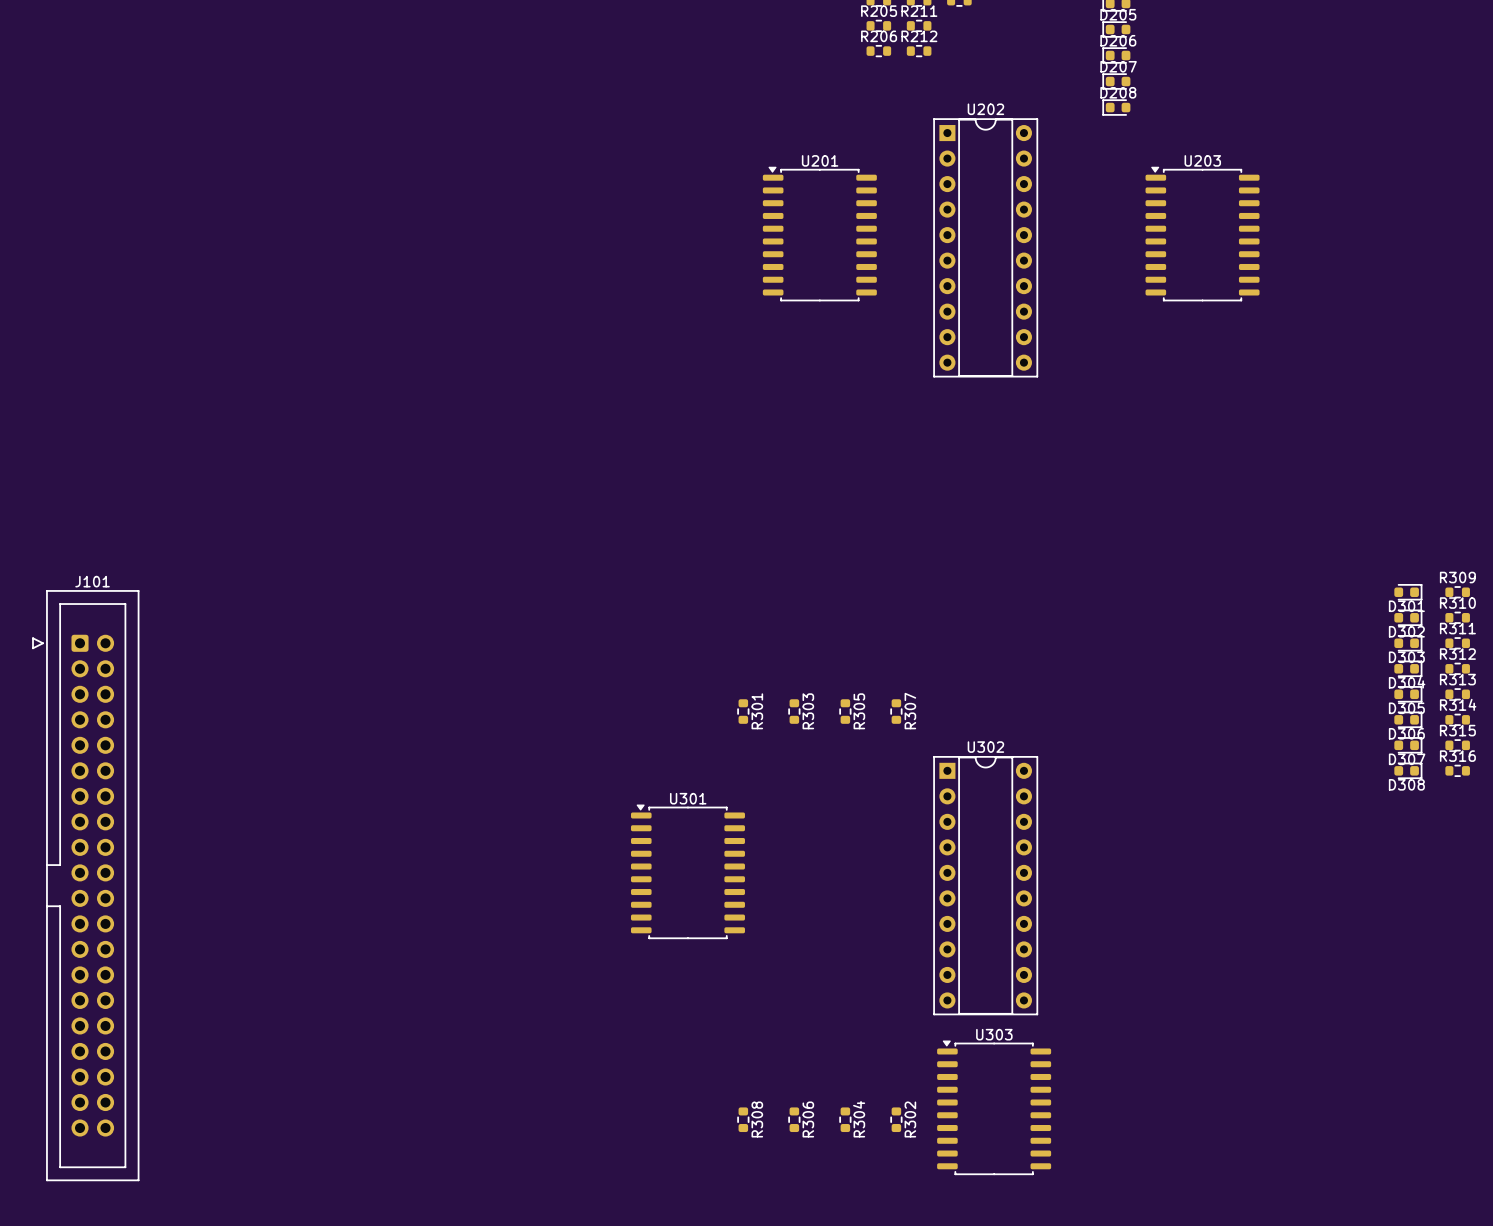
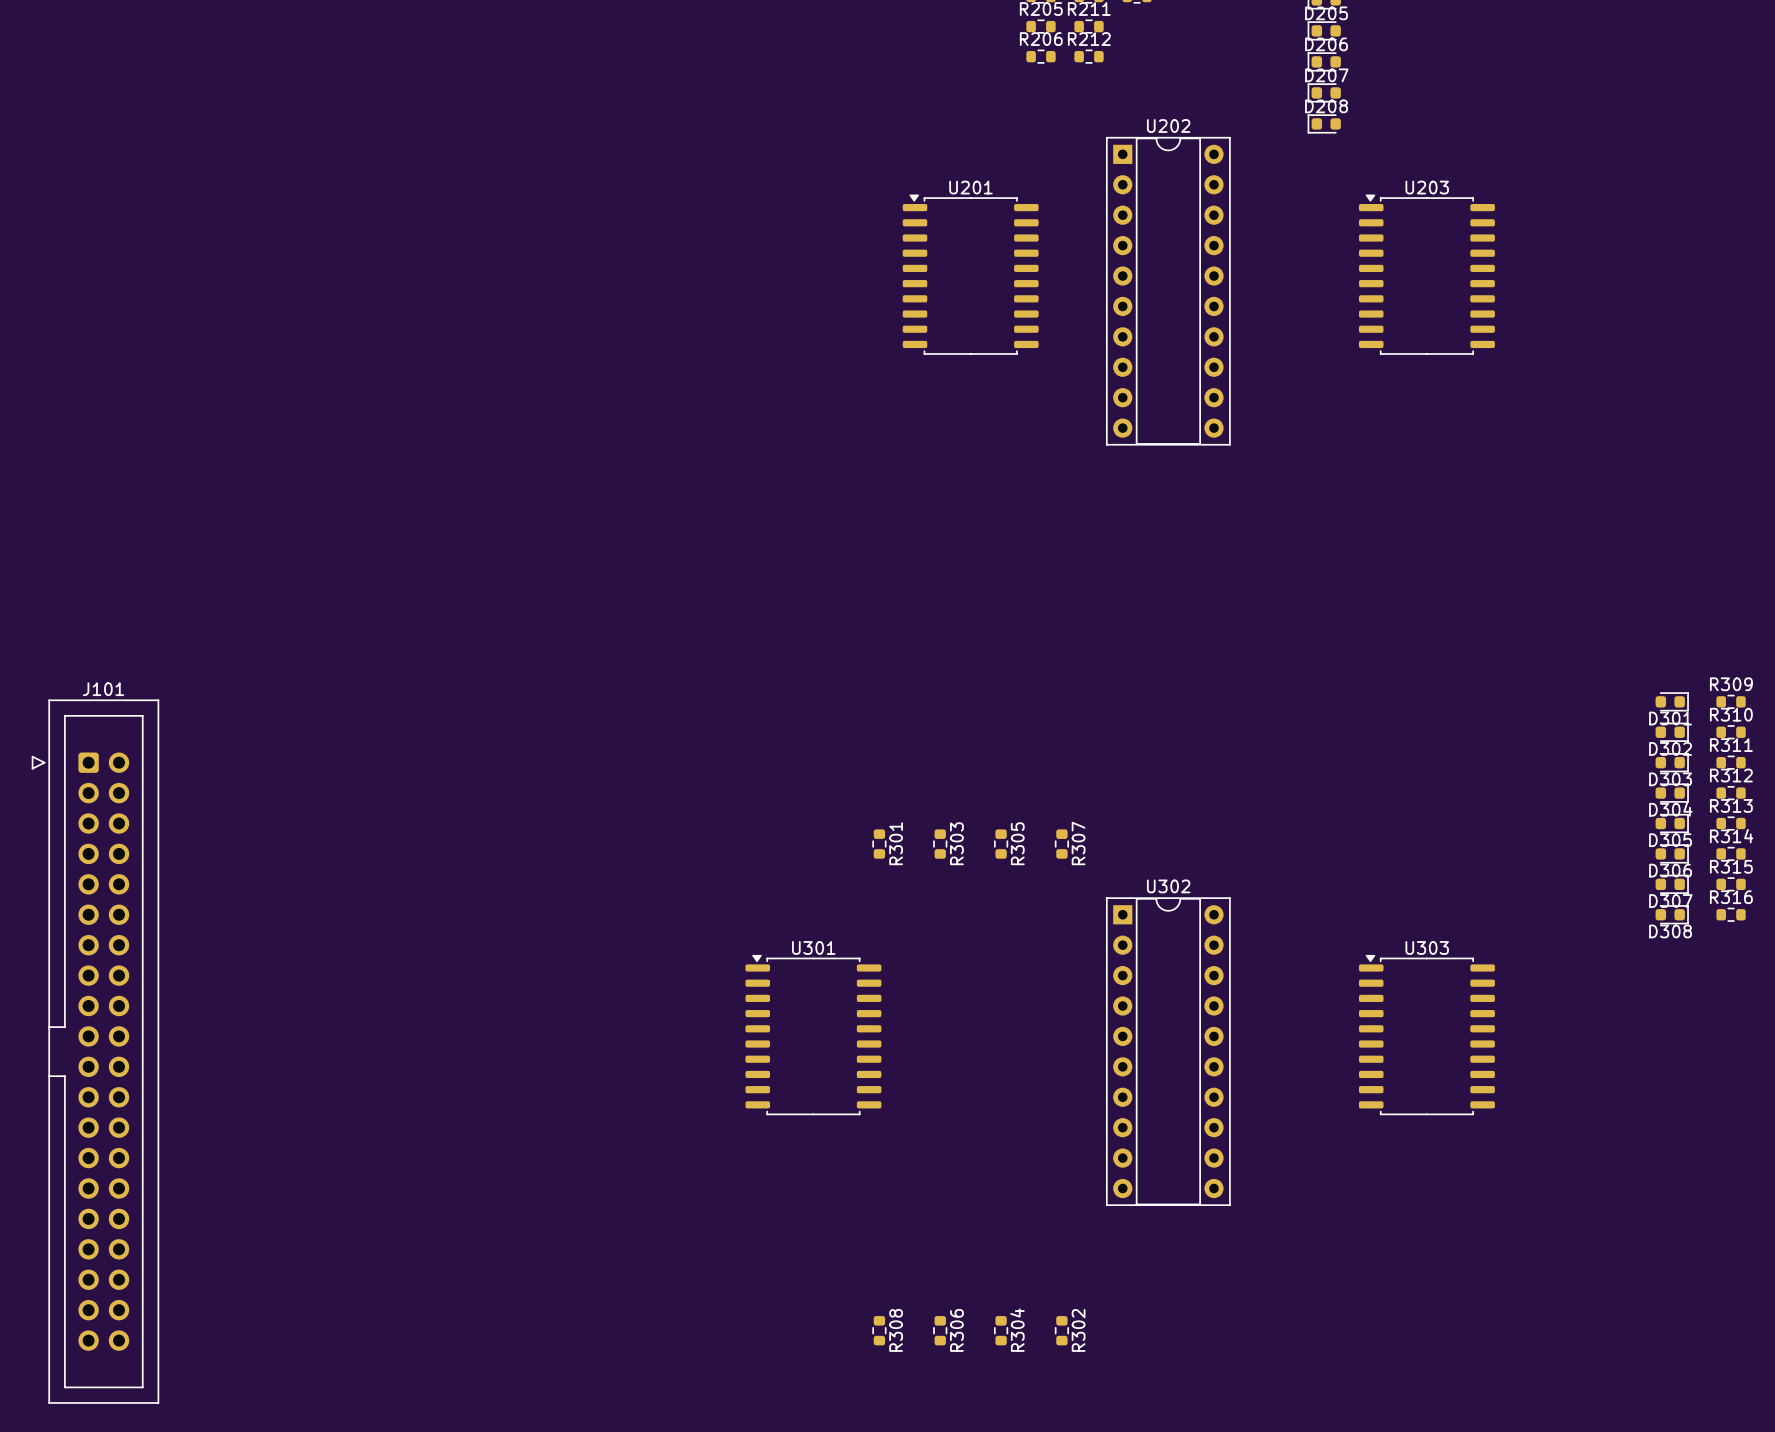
U303 position: (994, 1107) -> (1426, 1035)

